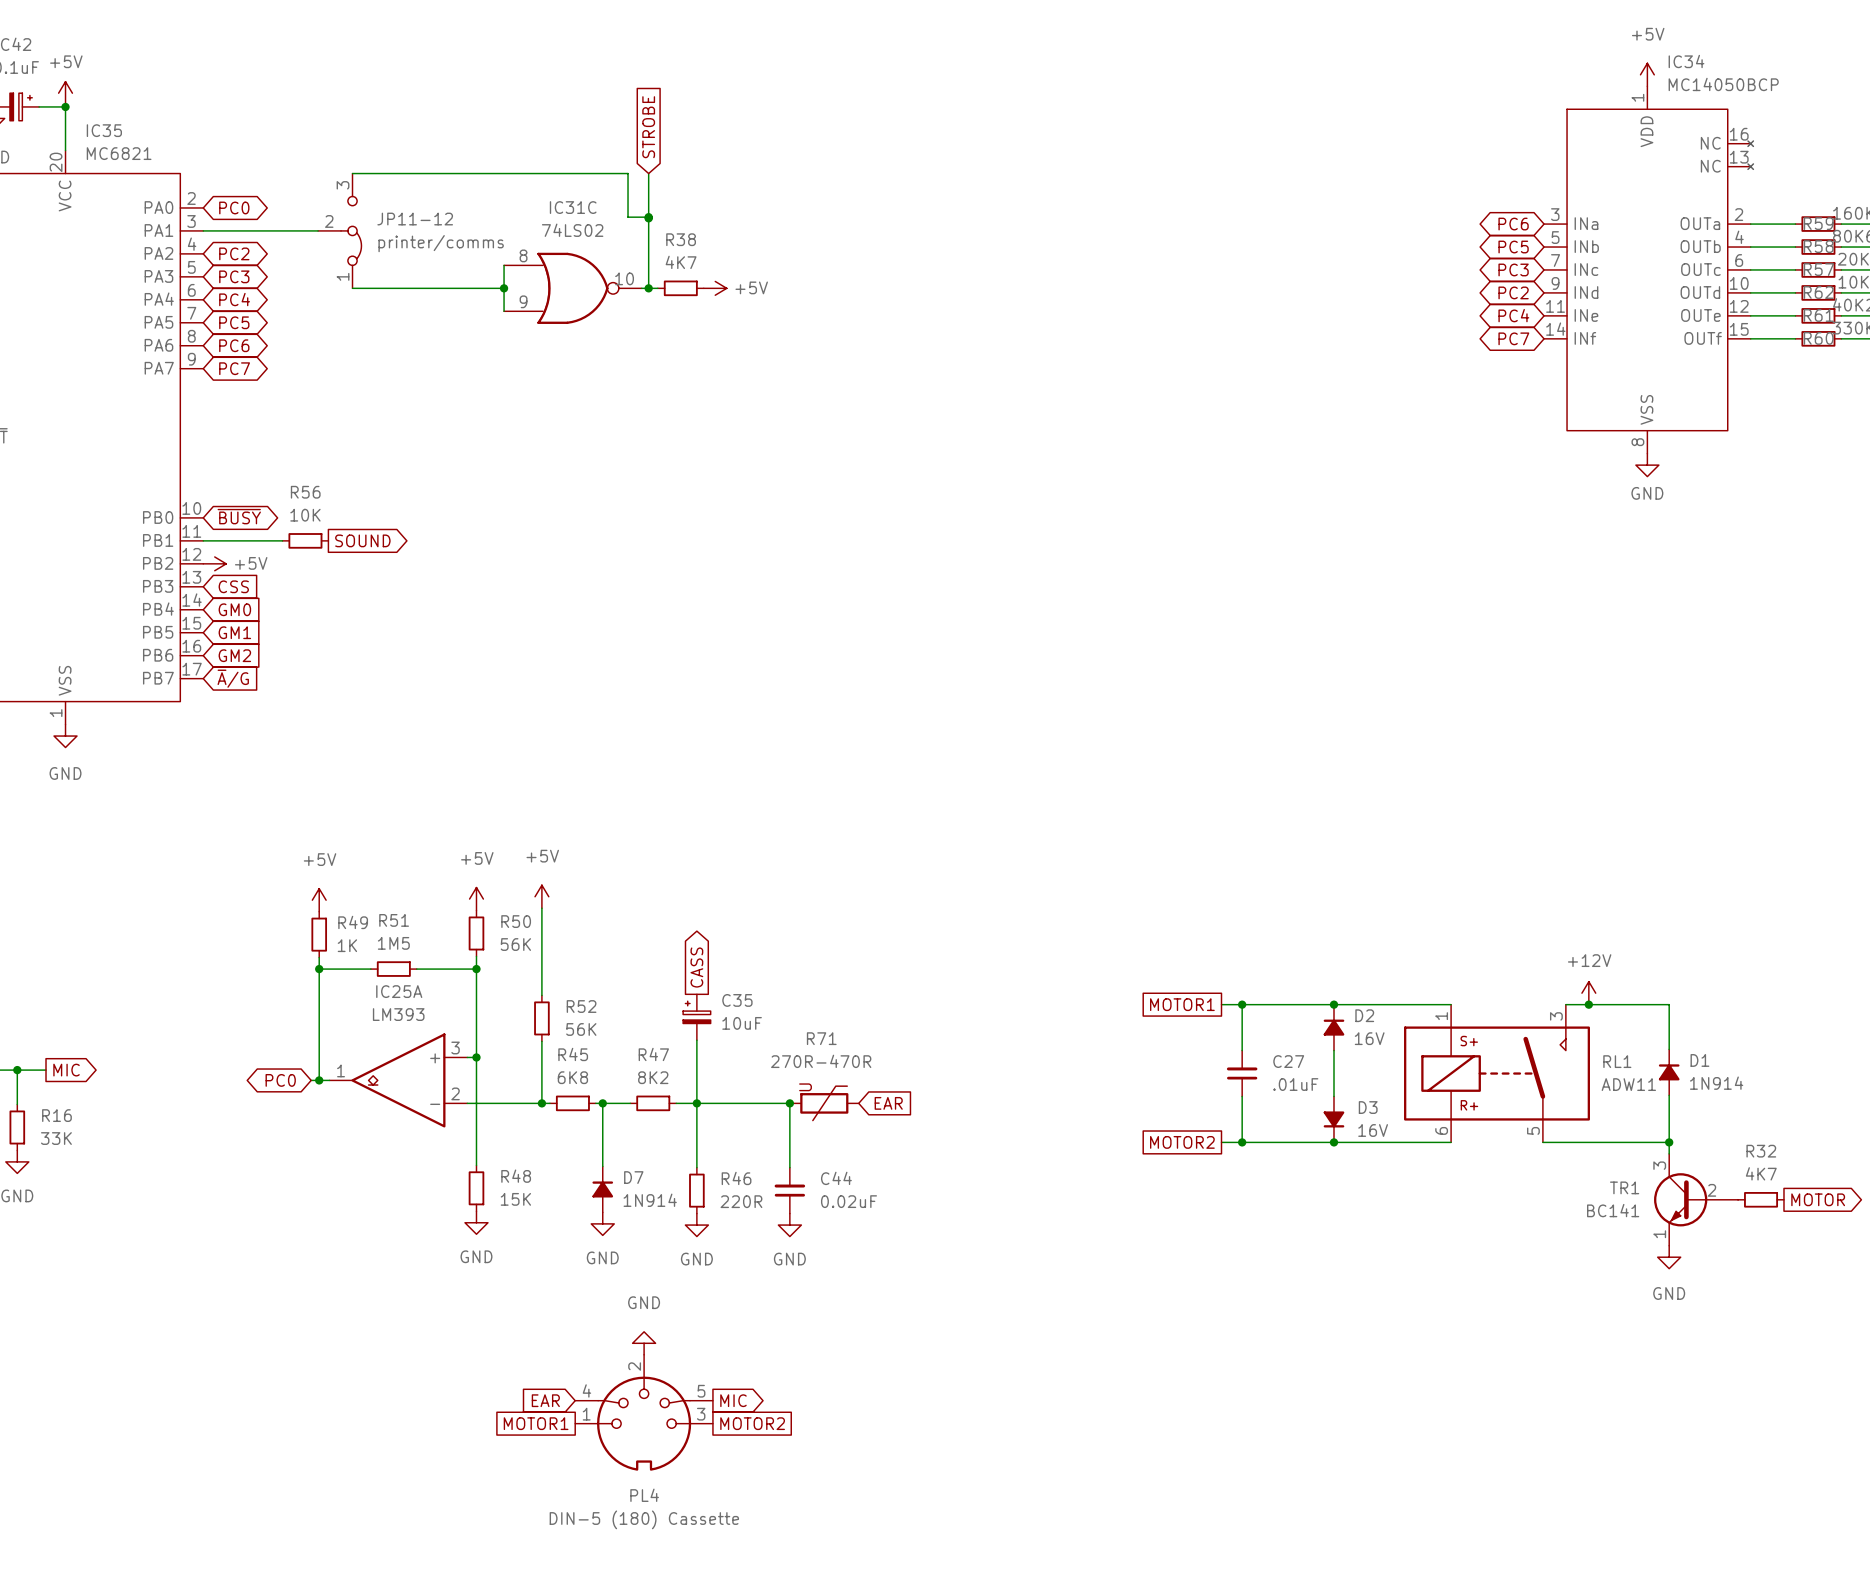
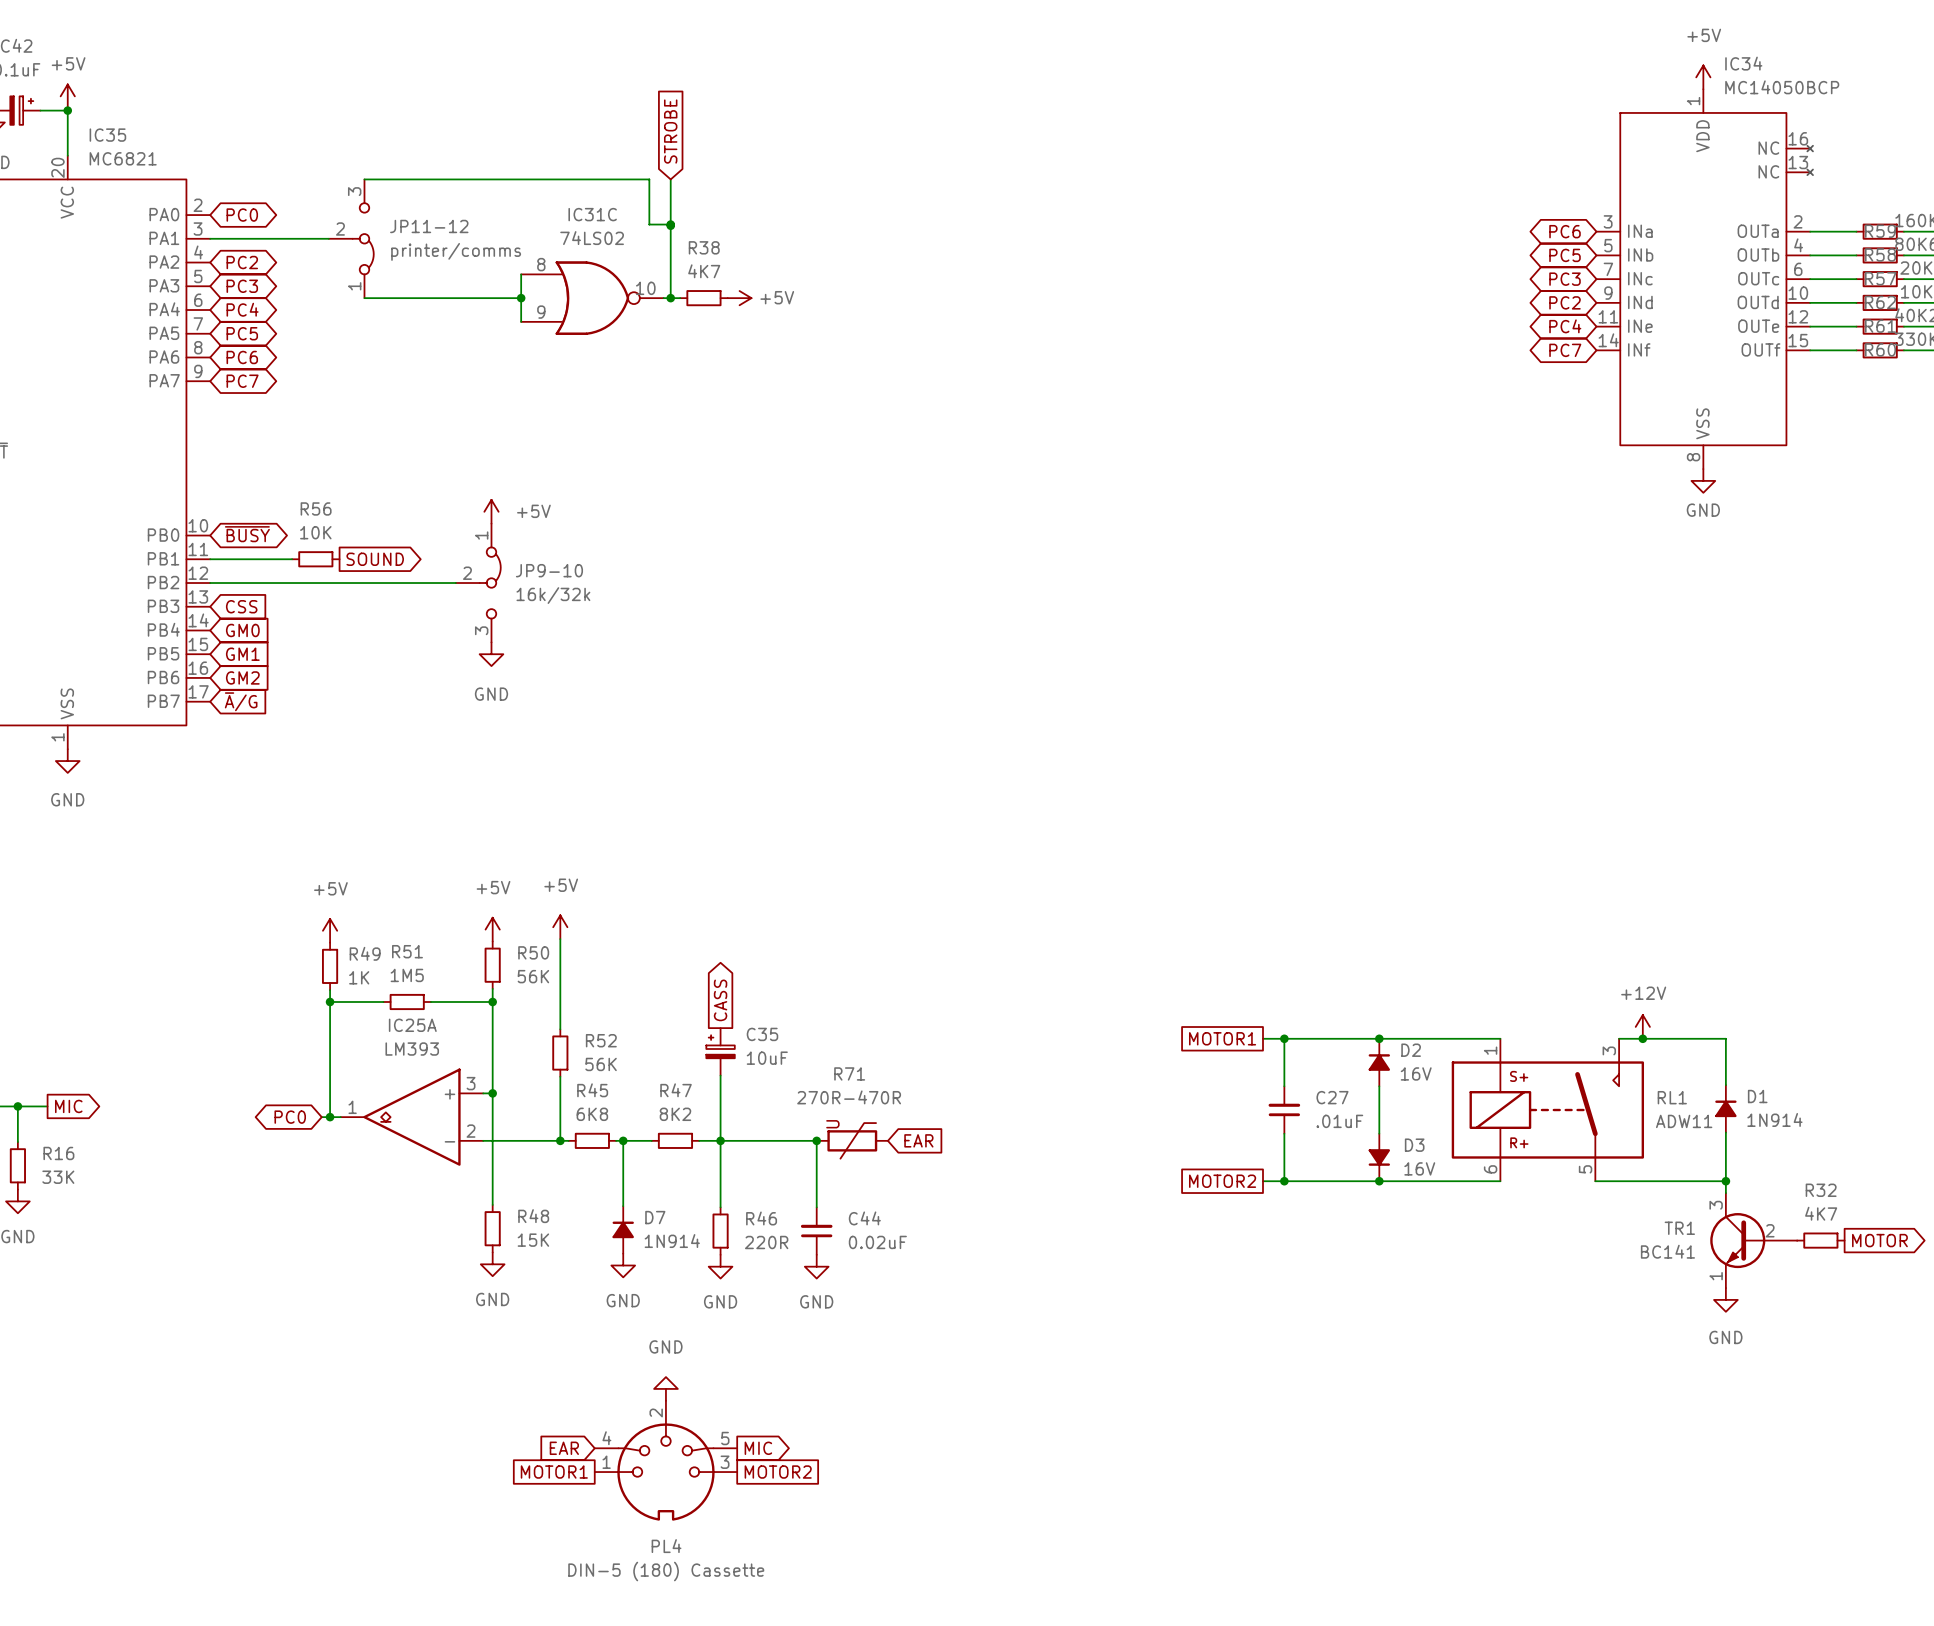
power symbol: none -> +5V (491, 511)
wire: none -> (210, 583) (455, 583)
power symbol: +5V (214, 563) -> none
JP9-10: none -> 16k/32k (478, 583)
power symbol: none -> GND (491, 654)

